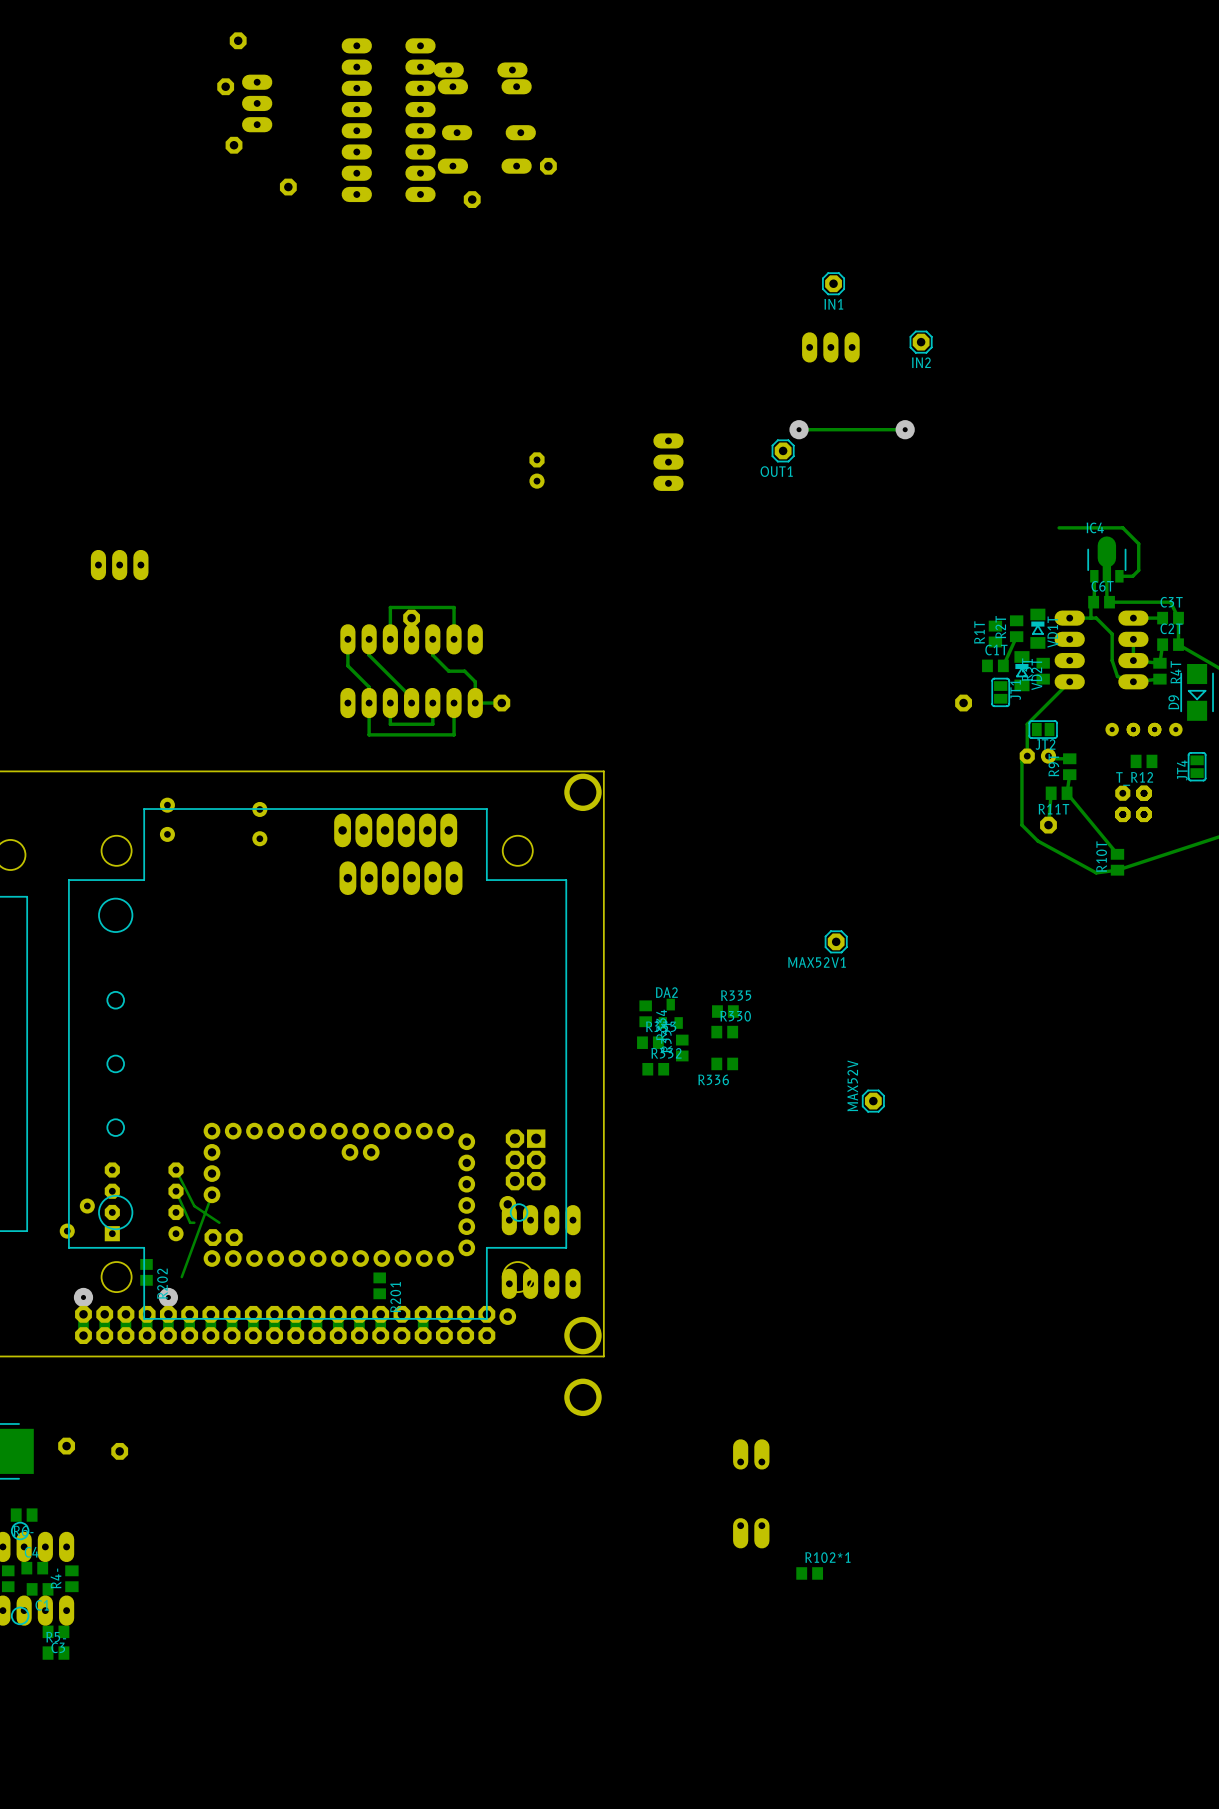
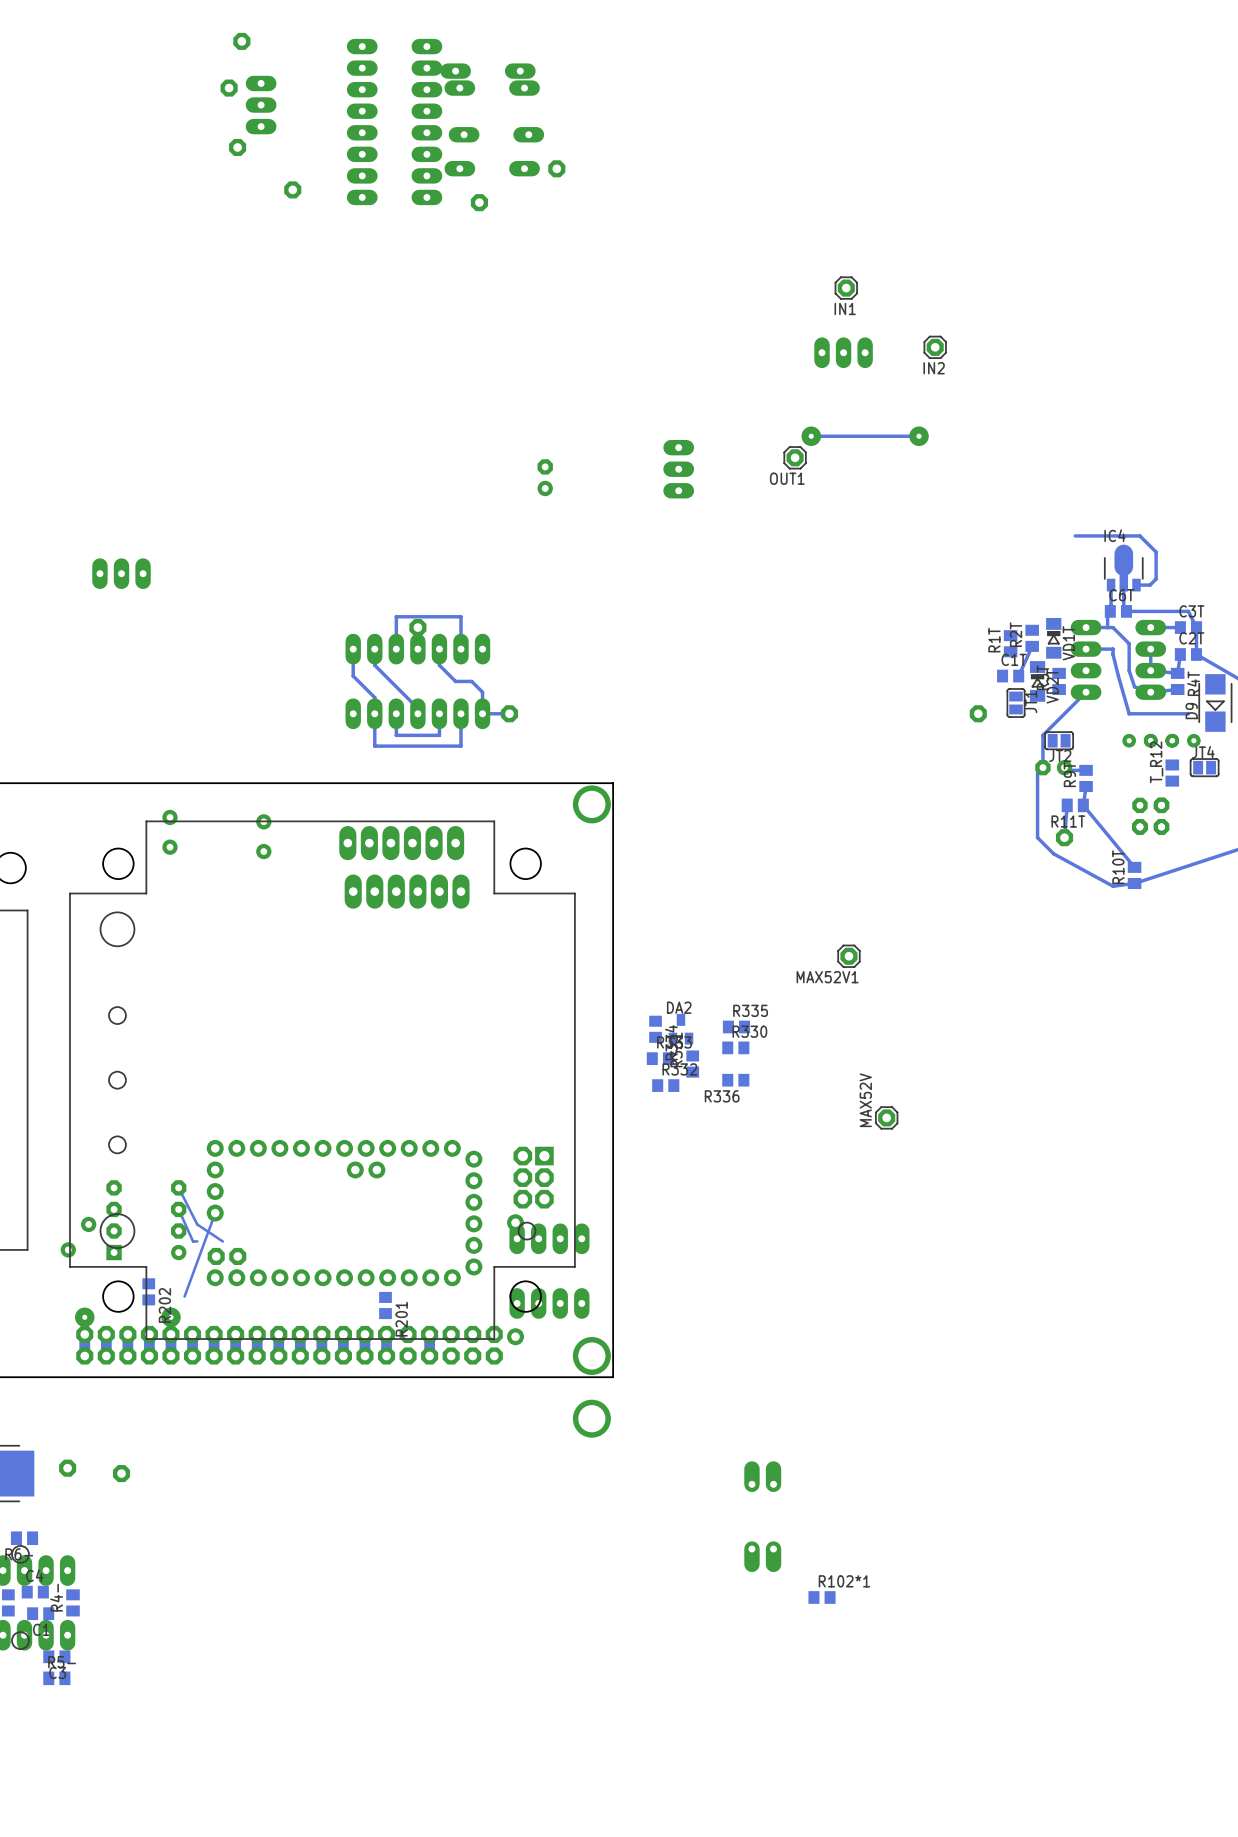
track: none -> (1086, 649) (1113, 649) (1129, 713) (1188, 713)
T_R12 rotation: 0° (1144, 761) -> 90° clockwise (1172, 773)
JT4 rotation: 0° (1197, 766) -> 90° clockwise (1204, 767)

